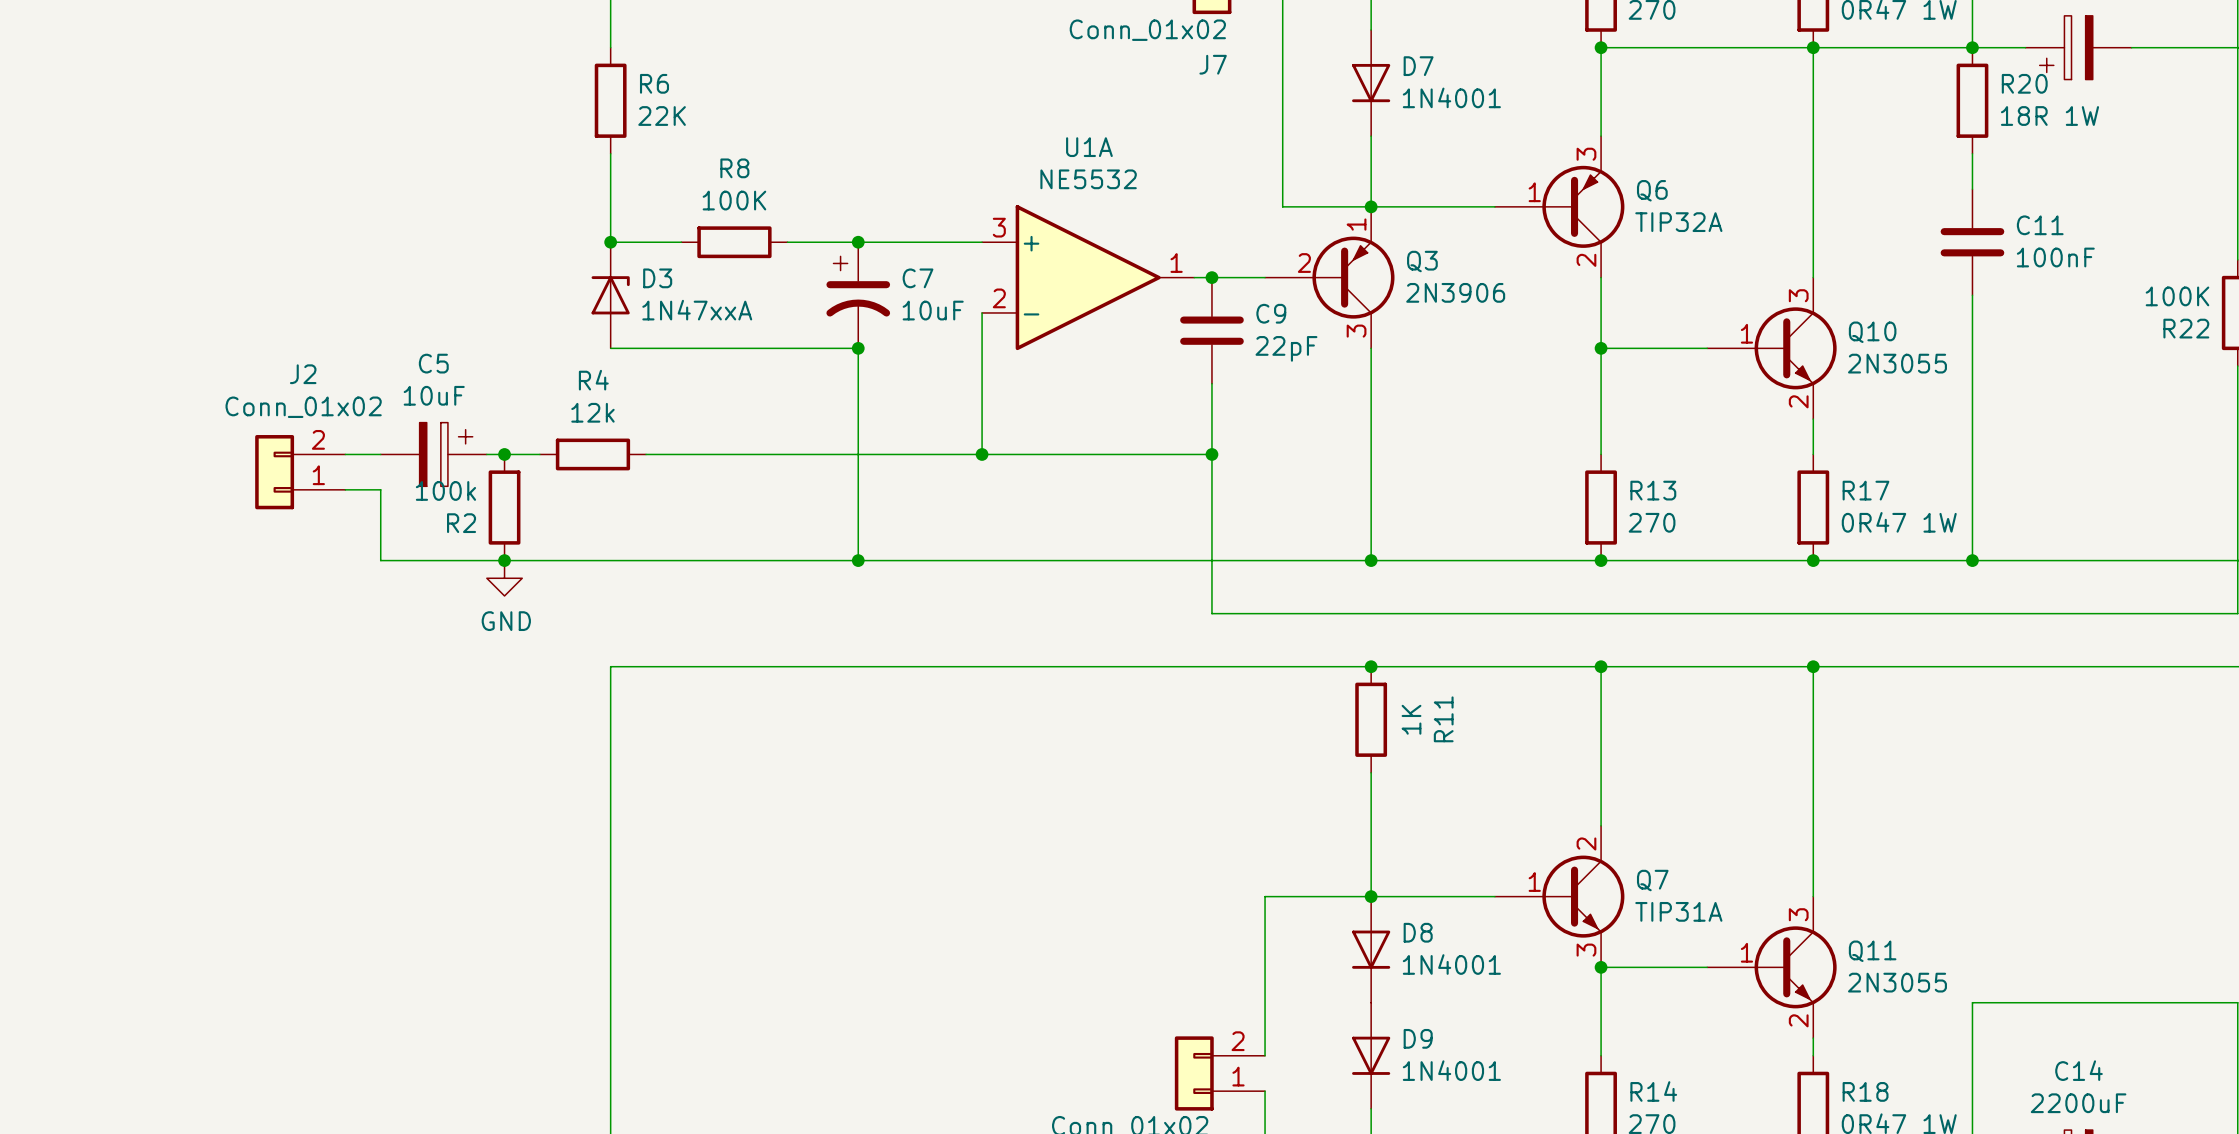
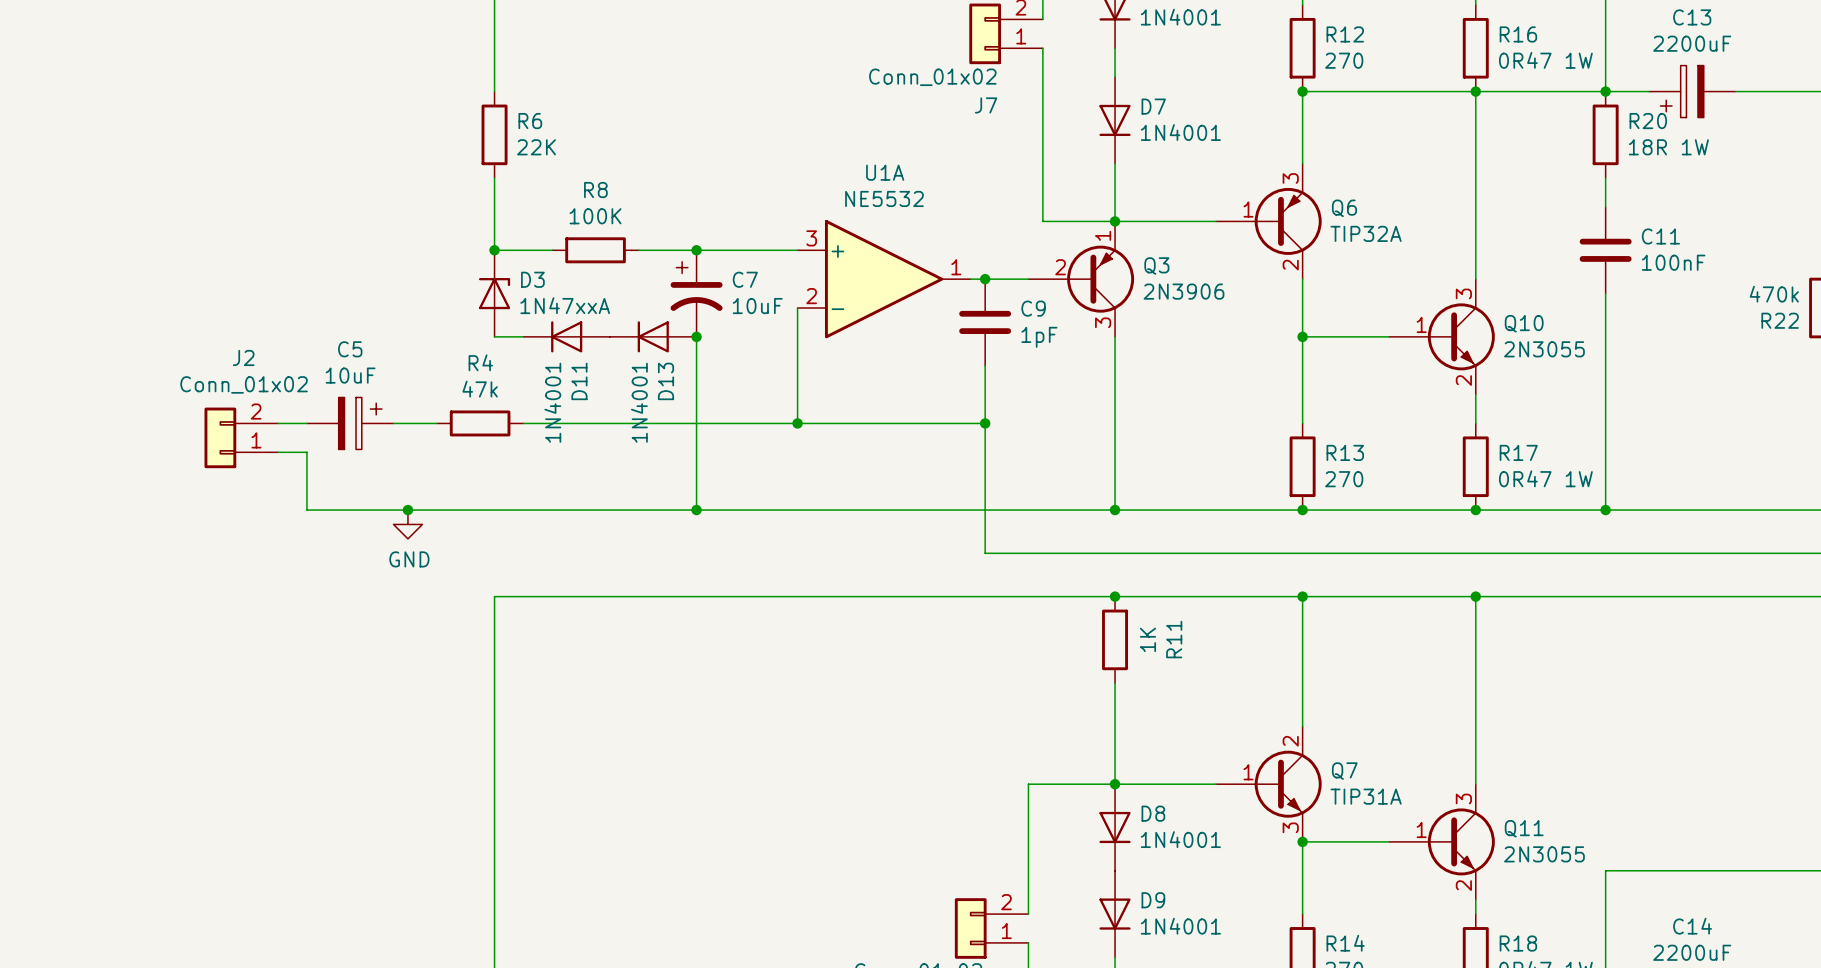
R22 value: 100K (2177, 296) -> 470k (1774, 294)
D11: none -> 1N4001 (566, 336)
D13: none -> 1N4001 (653, 336)
C9 value: 22pF (1286, 348) -> 1pF (1039, 337)
R4 value: 12k (592, 412) -> 47k (480, 389)
junction: (504, 454) -> none
R2: 100k (504, 507) -> none

